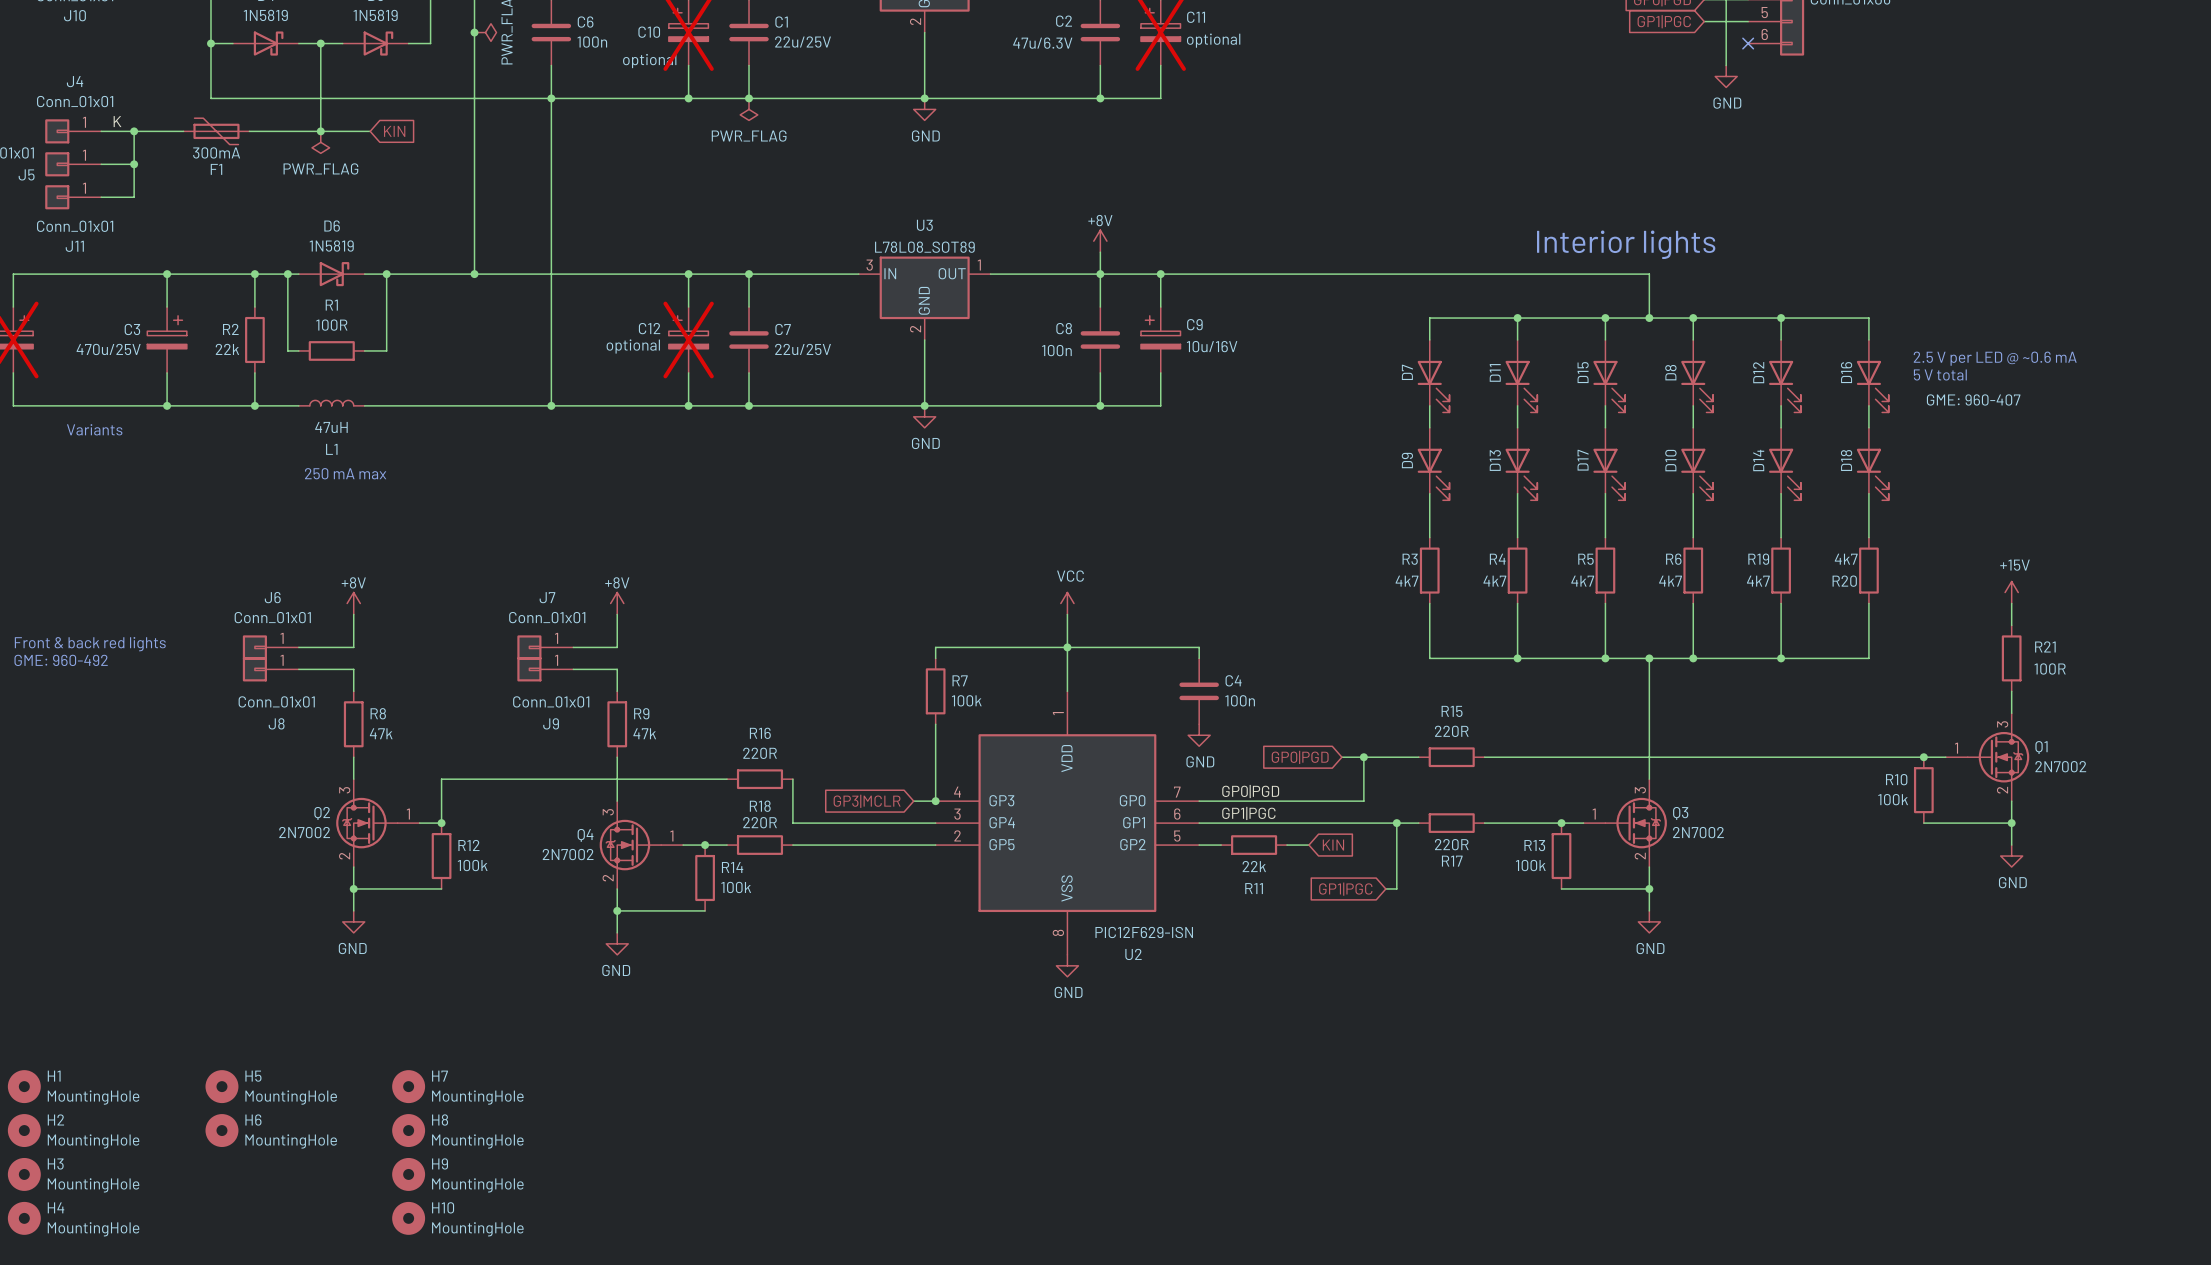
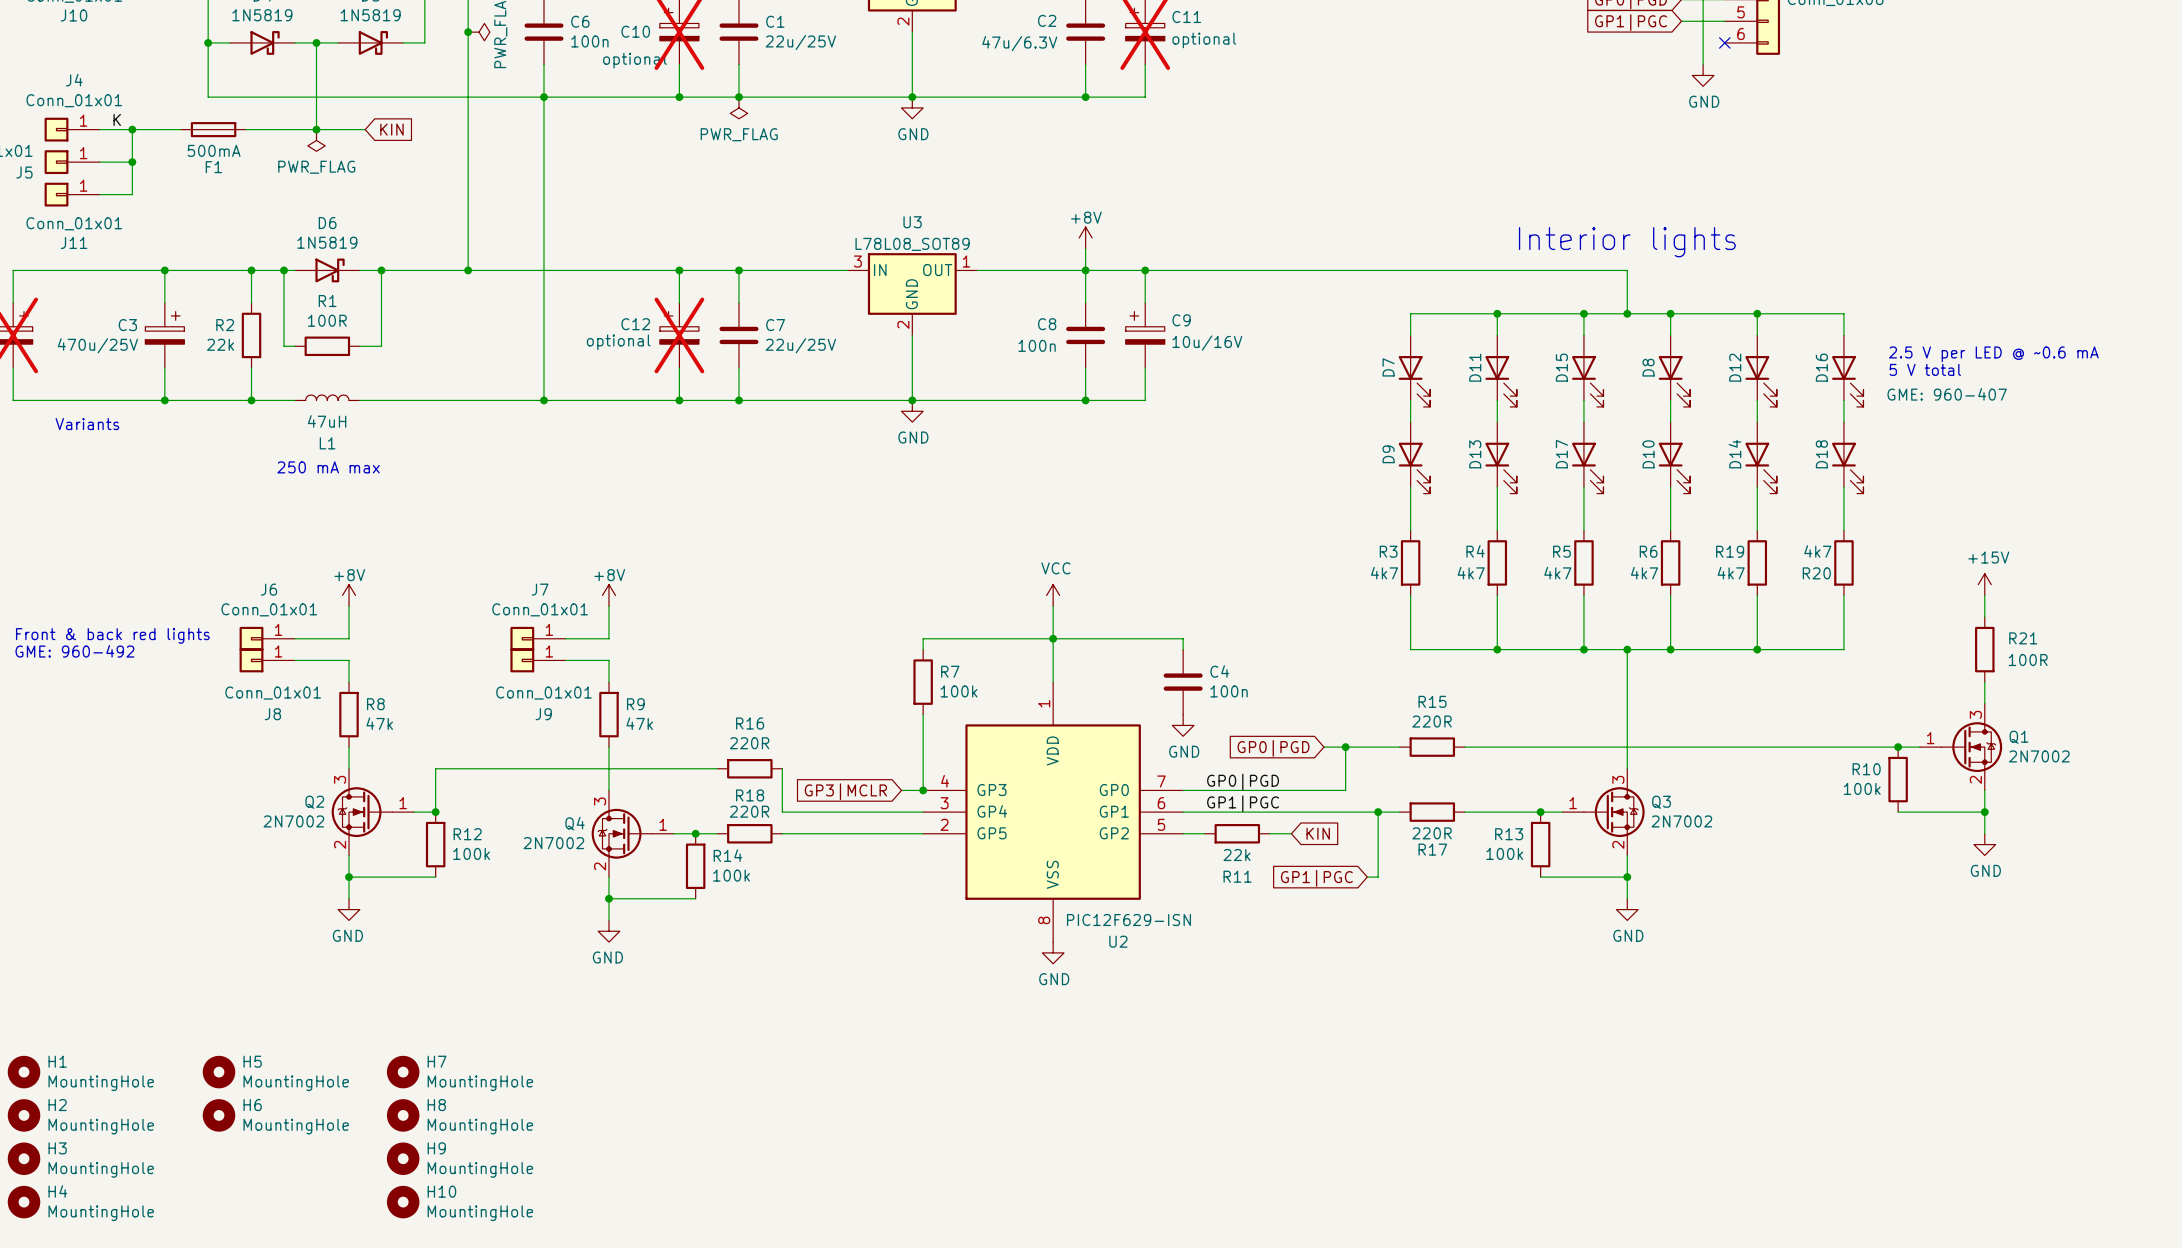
F1 symbol: [183, 118, 250, 145] -> [181, 122, 247, 138]
F1 value: 300mA (216, 152) -> 500mA (214, 150)

